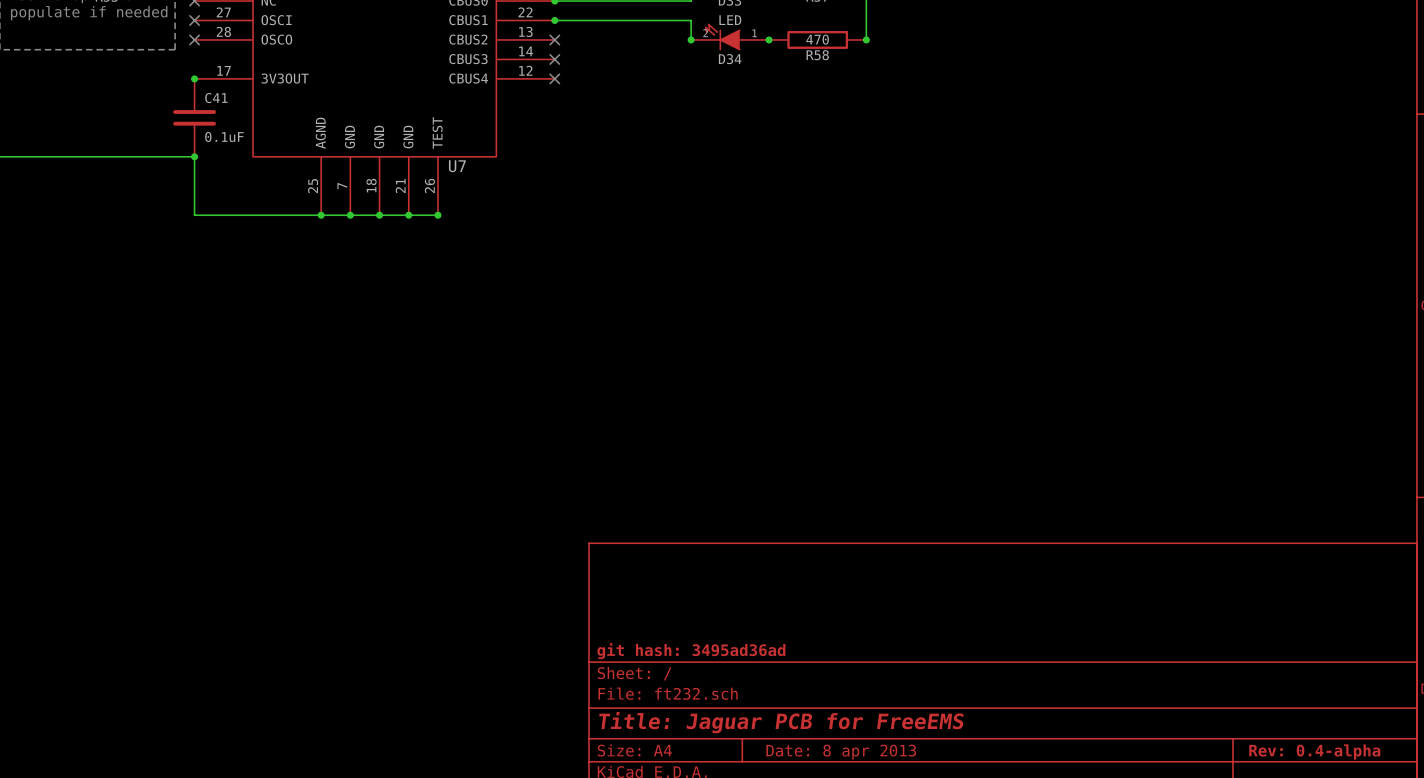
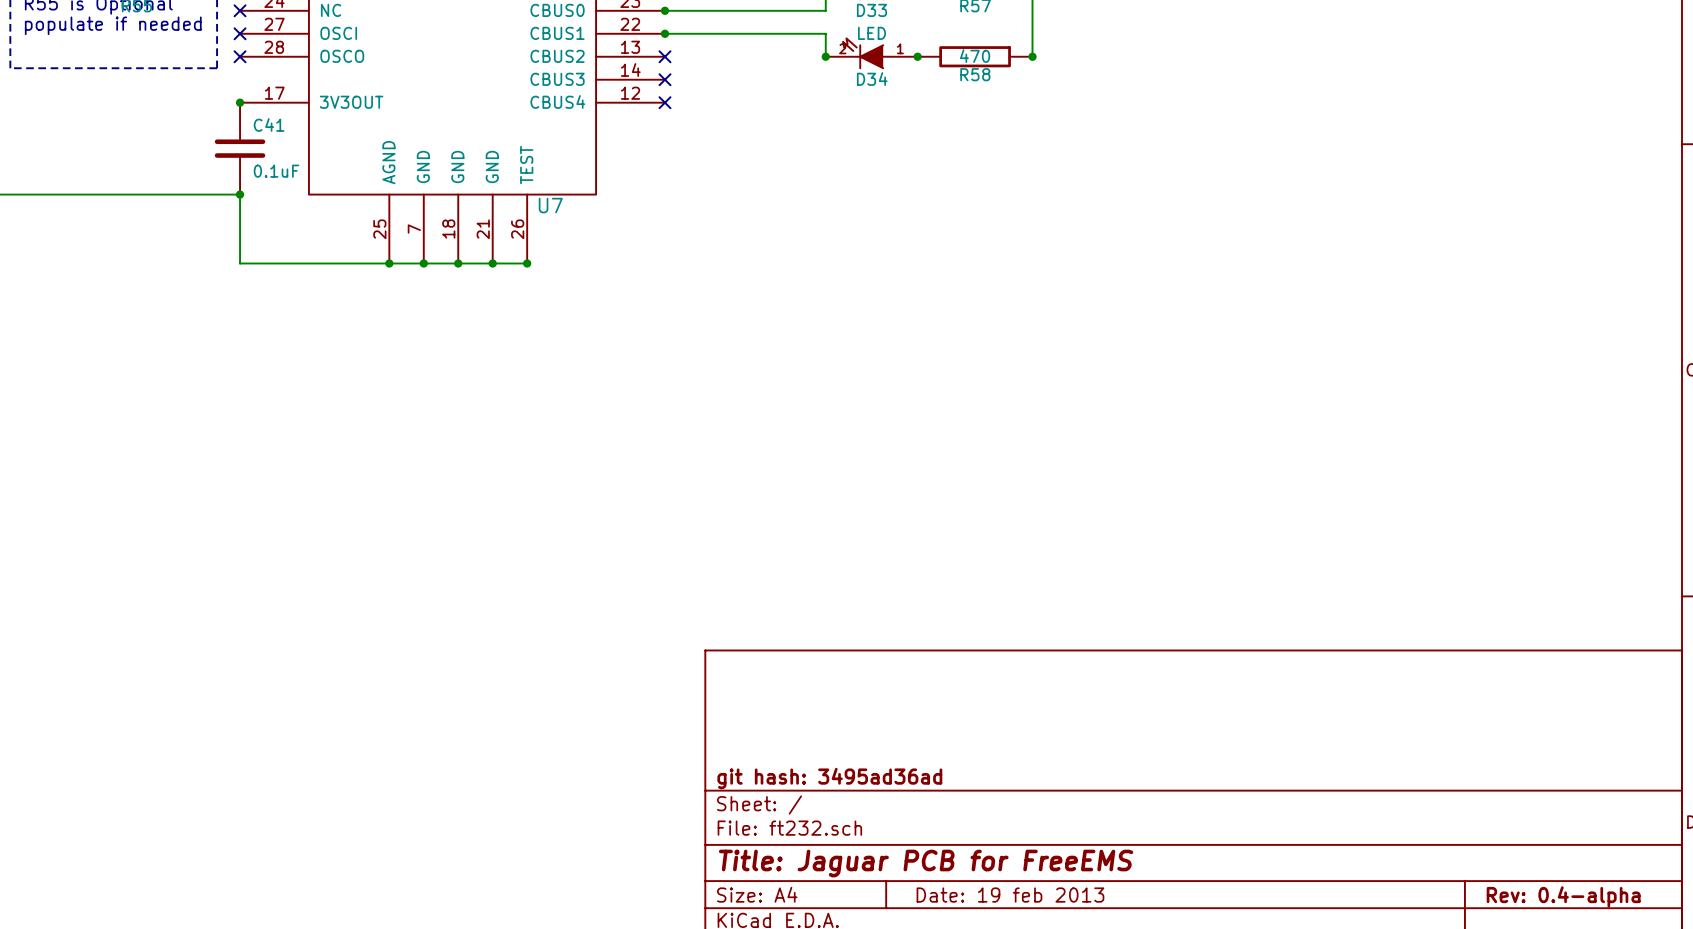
title block: Date: 8 apr 2013 (841, 752) -> Date: 19 feb 2013 (1010, 895)

